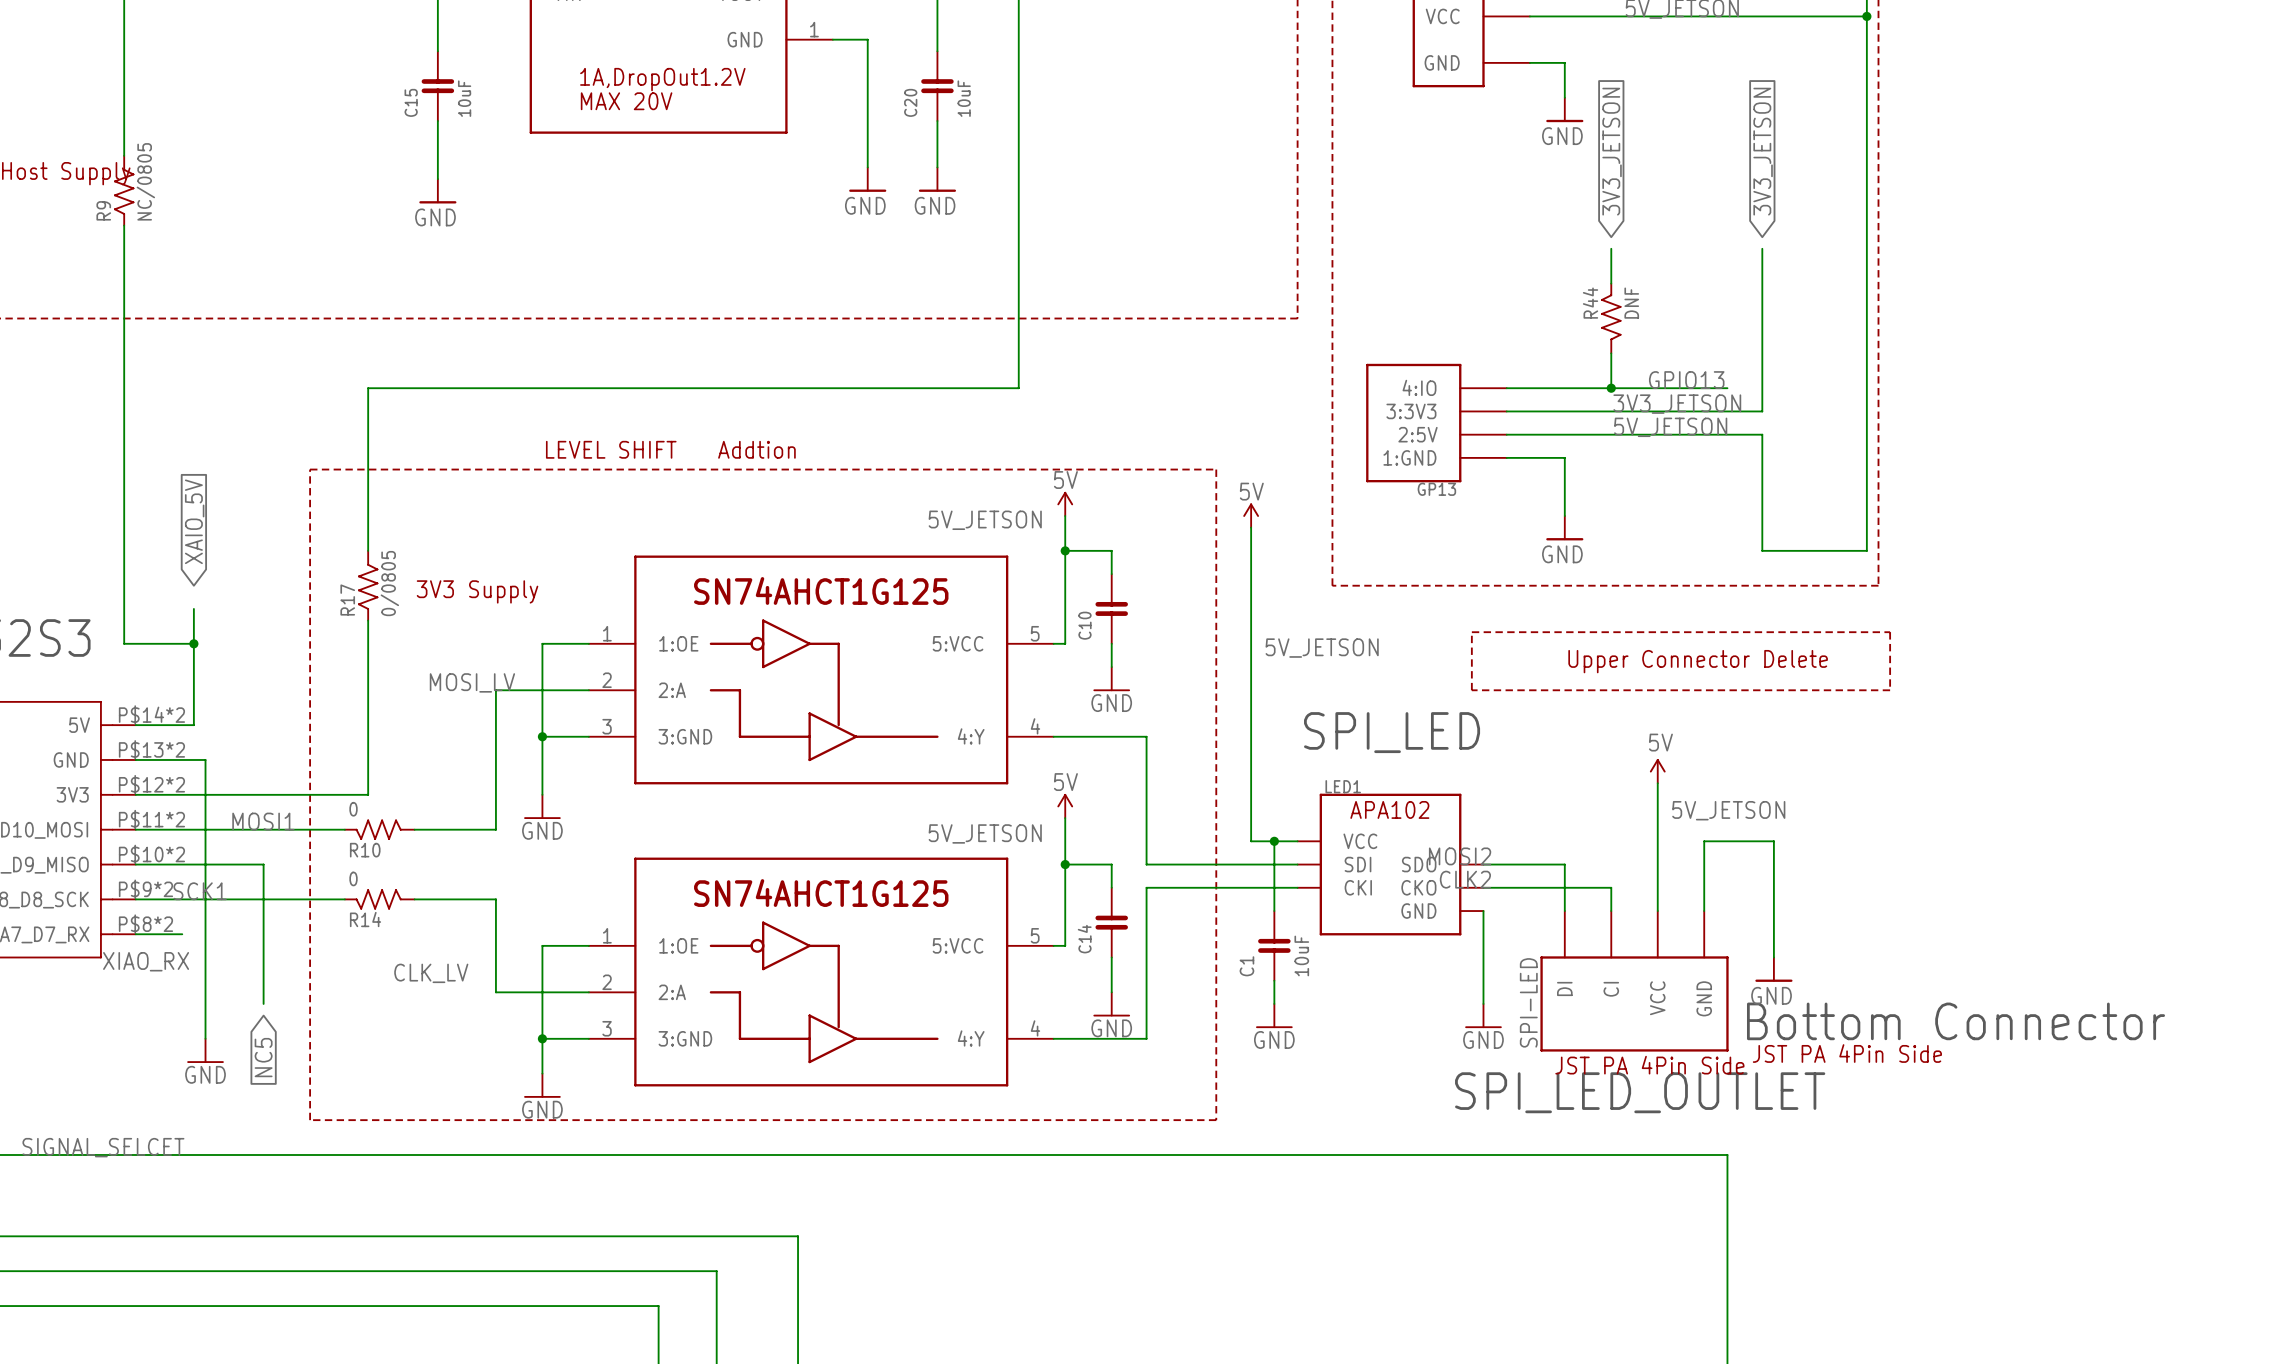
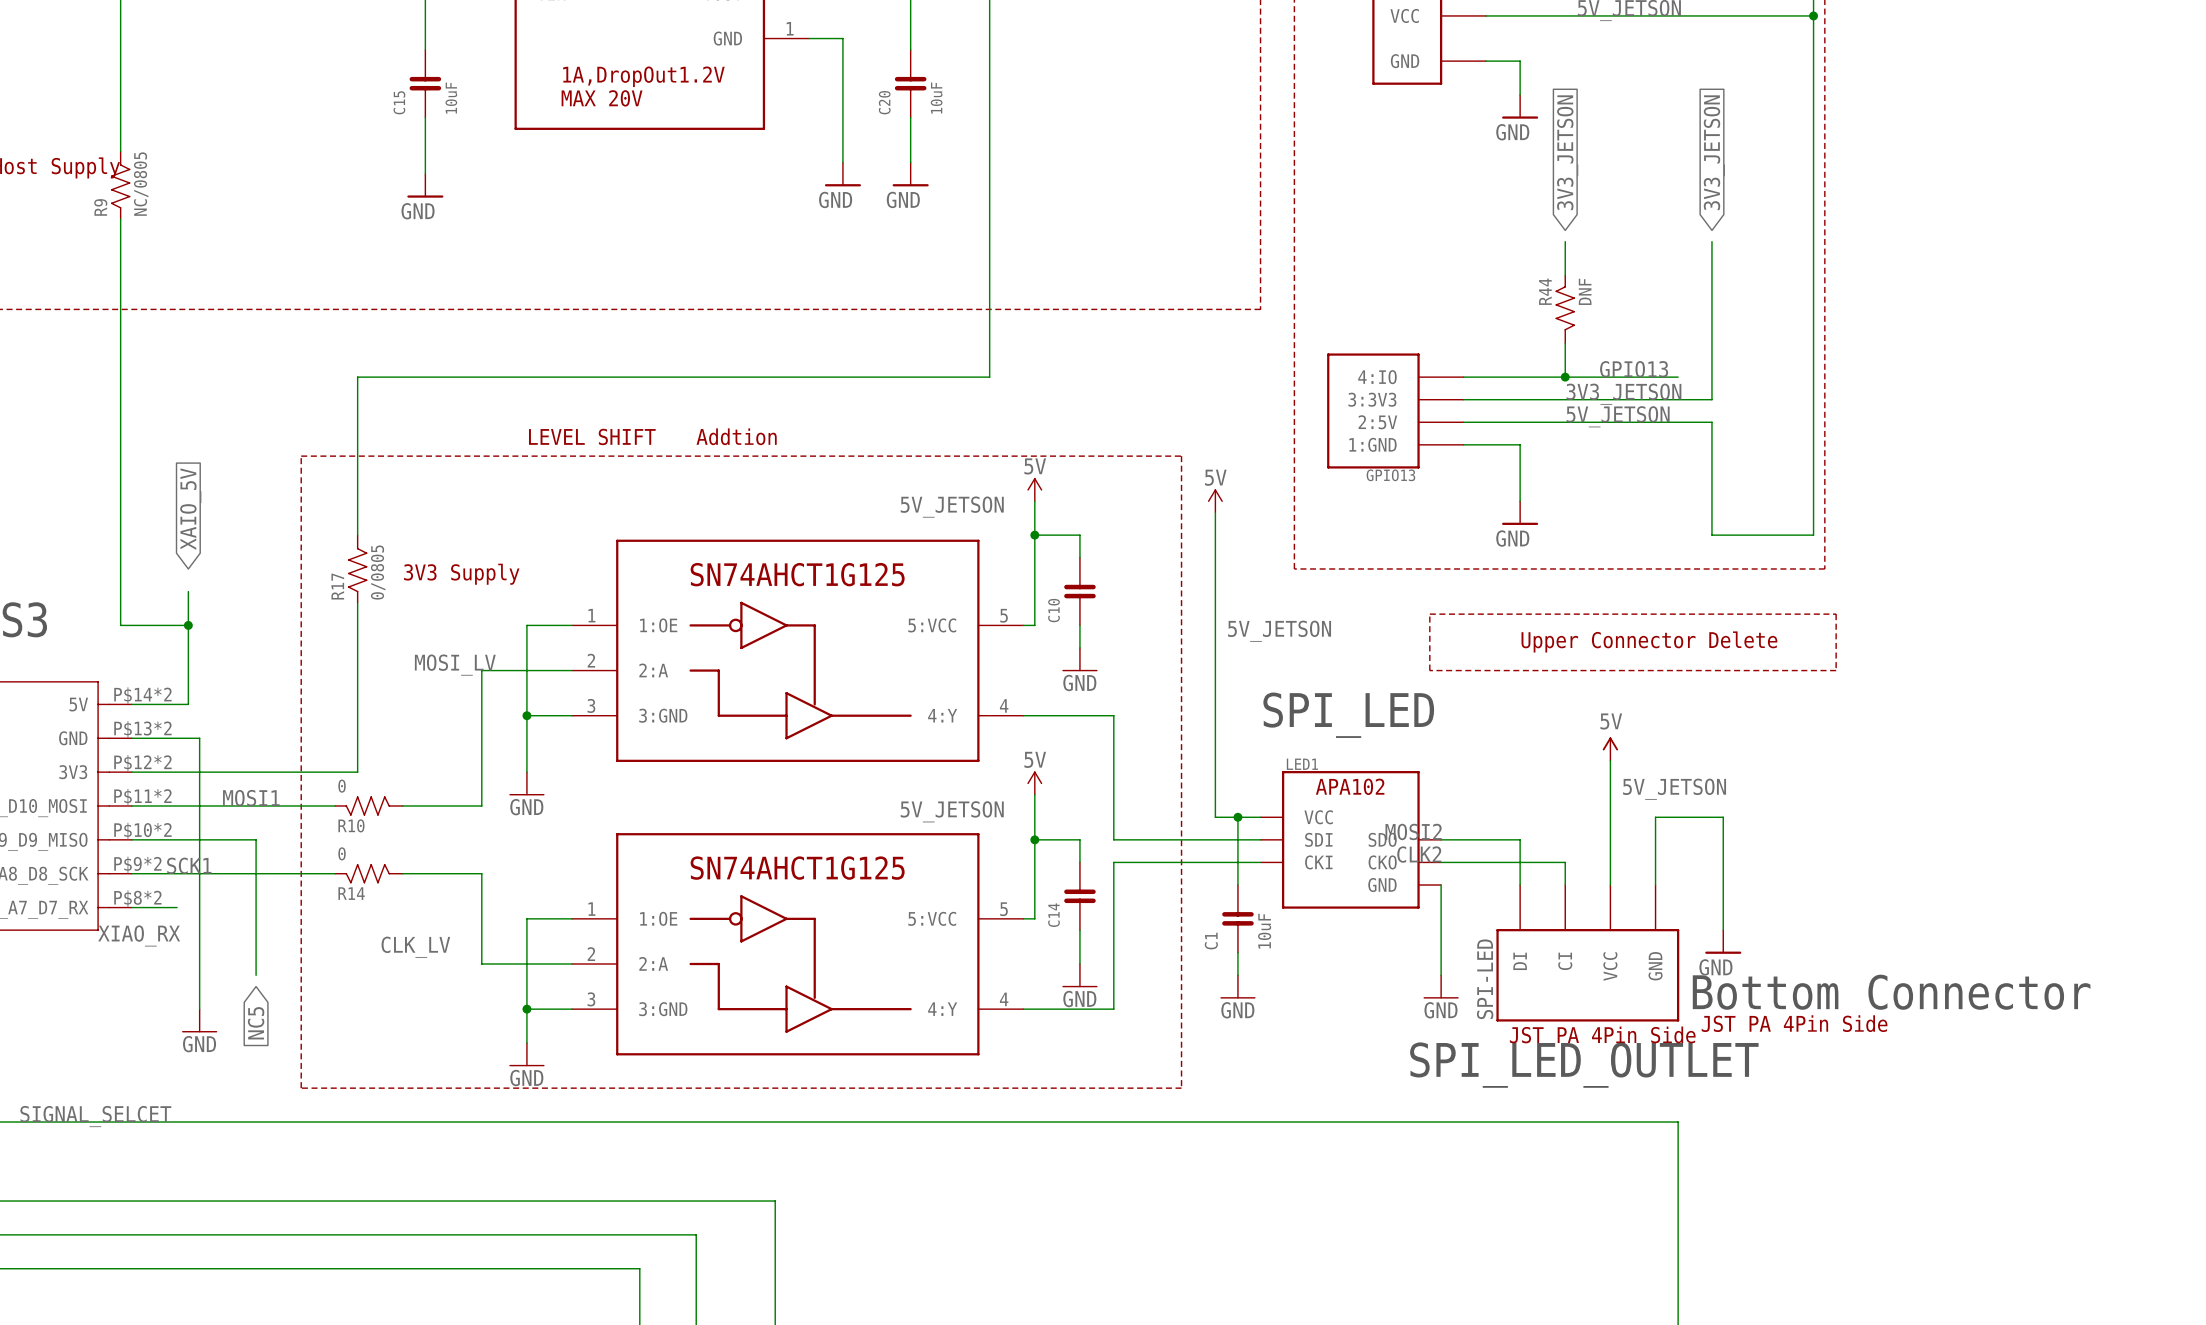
GP13 name: GP13 (1436, 489) -> GPIO13 (1390, 475)

